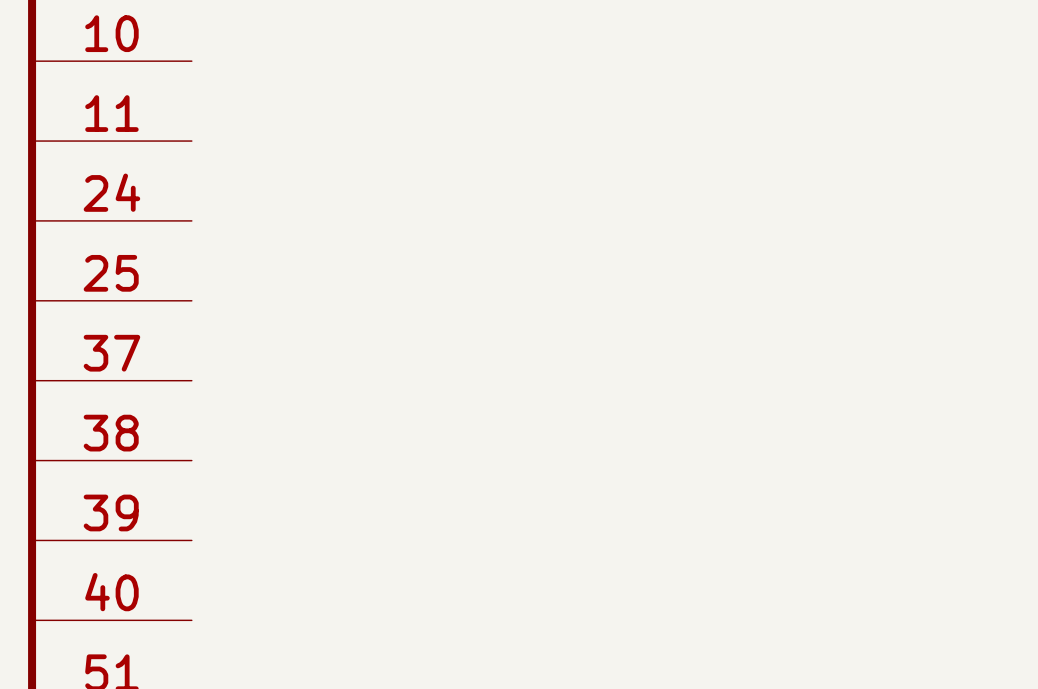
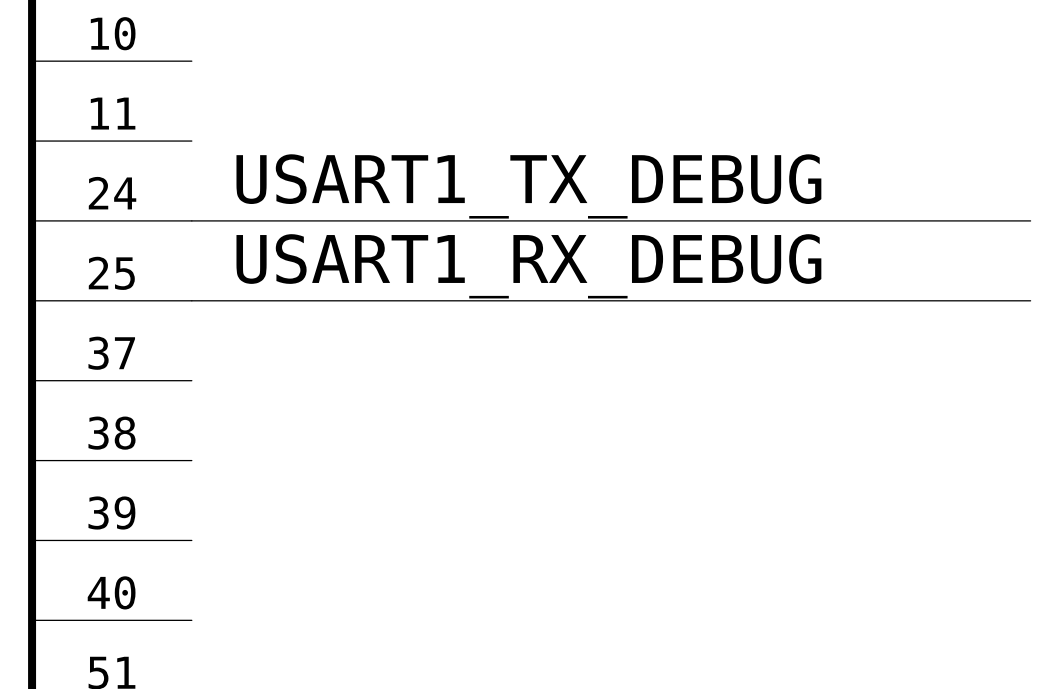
label: none -> USART1_TX_DEBUG (528, 186)
wire: none -> (191, 220) (1030, 220)
label: none -> USART1_RX_DEBUG (528, 266)
wire: none -> (191, 300) (1030, 300)

